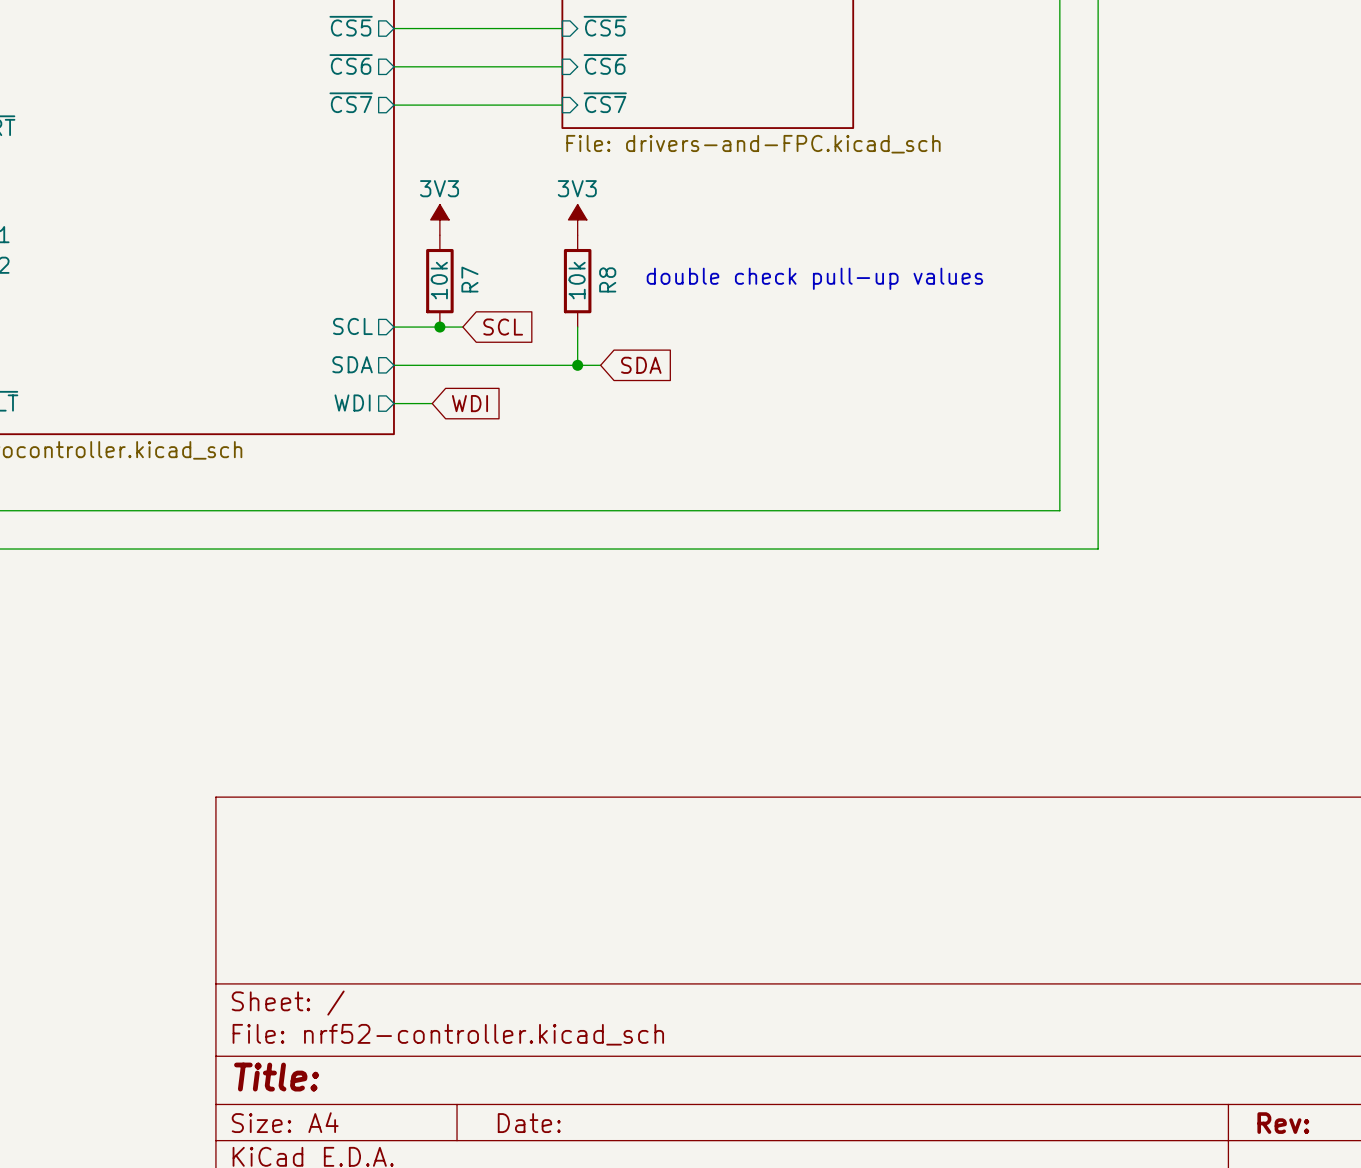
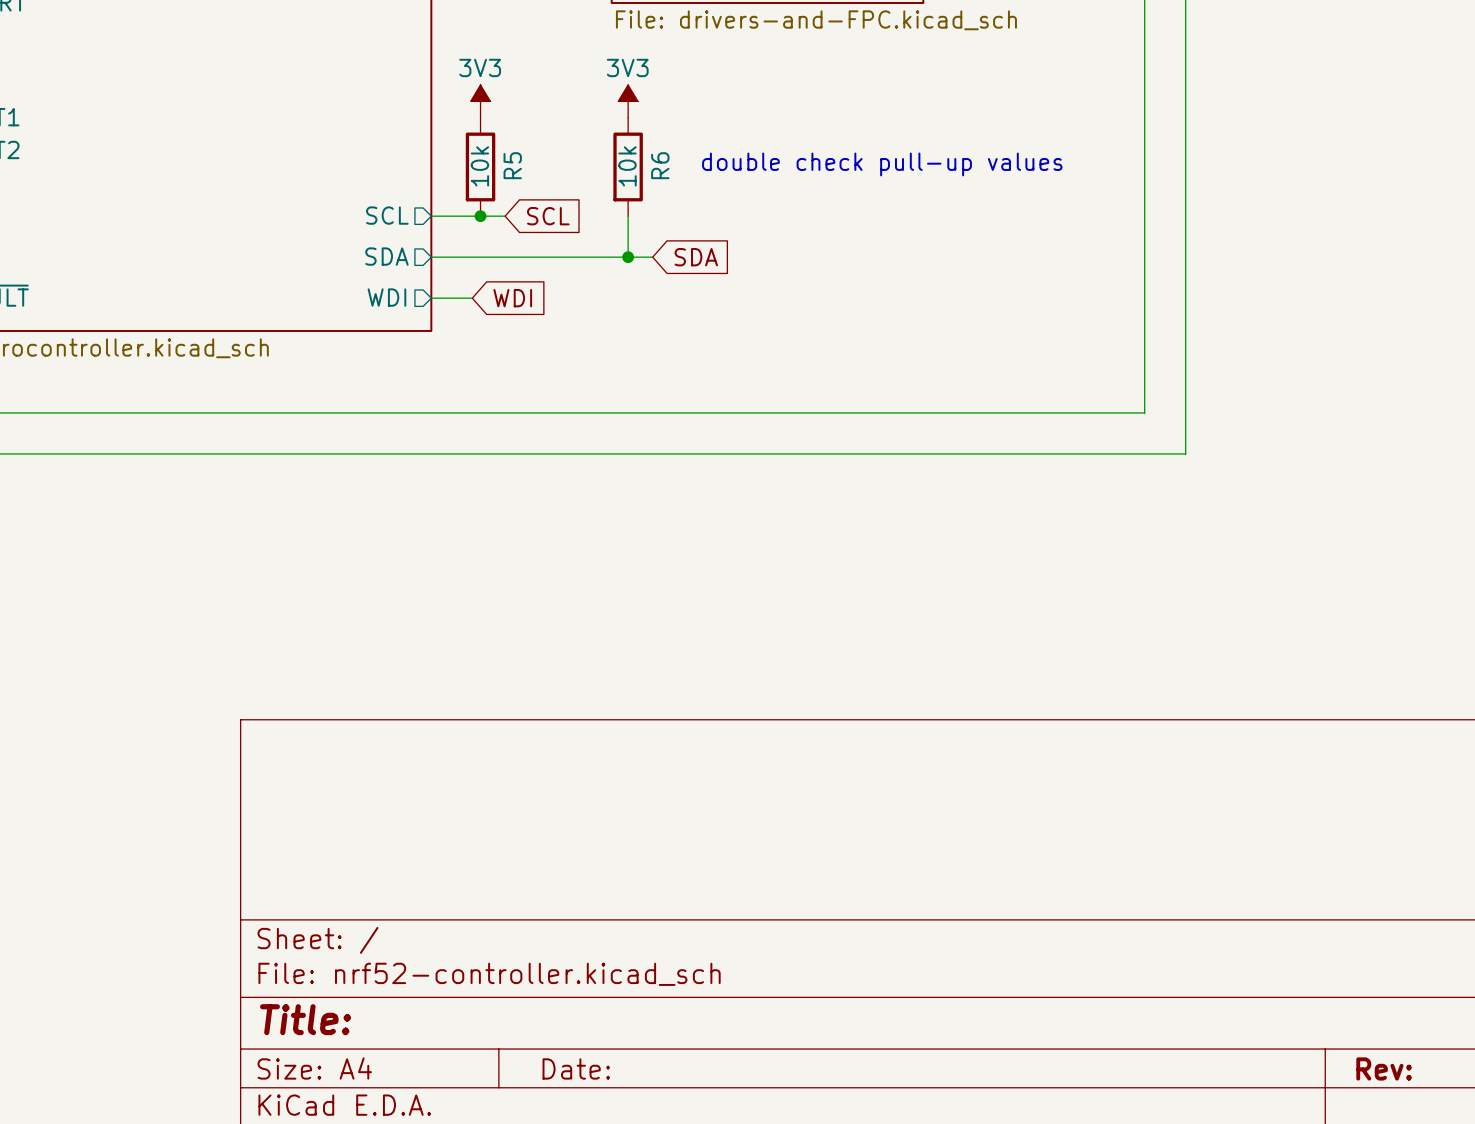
R7 name: R7 (469, 279) -> R5 (512, 165)
R8 name: R8 (607, 279) -> R6 (660, 165)

